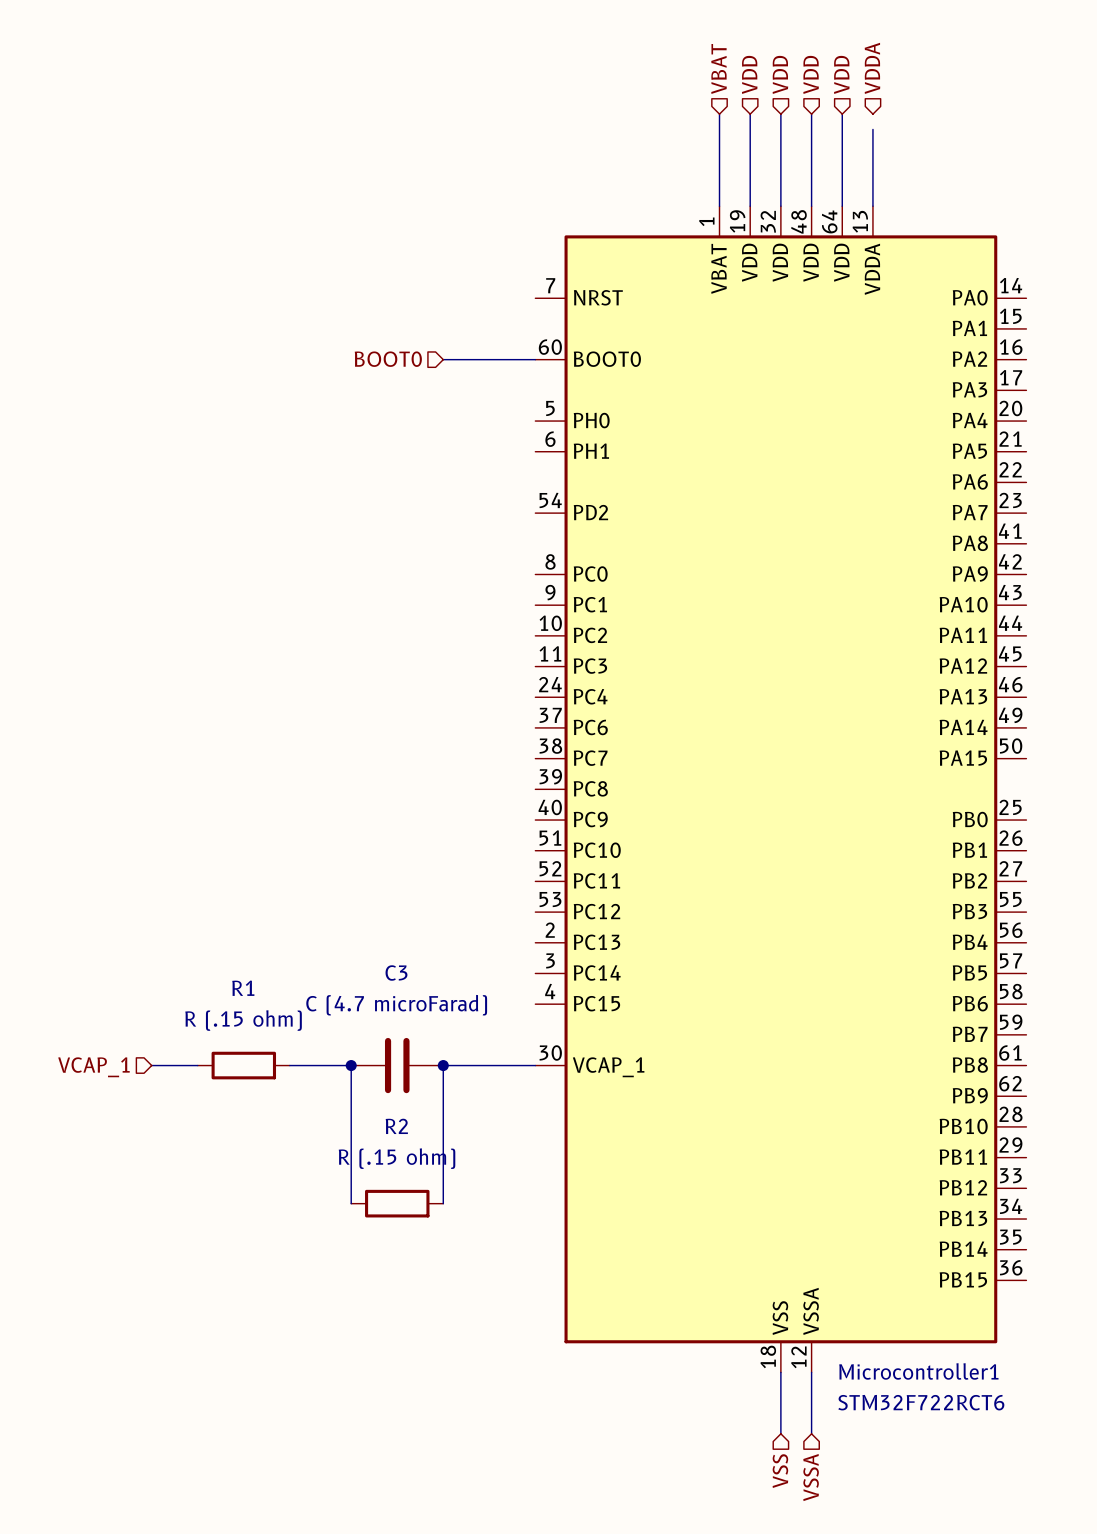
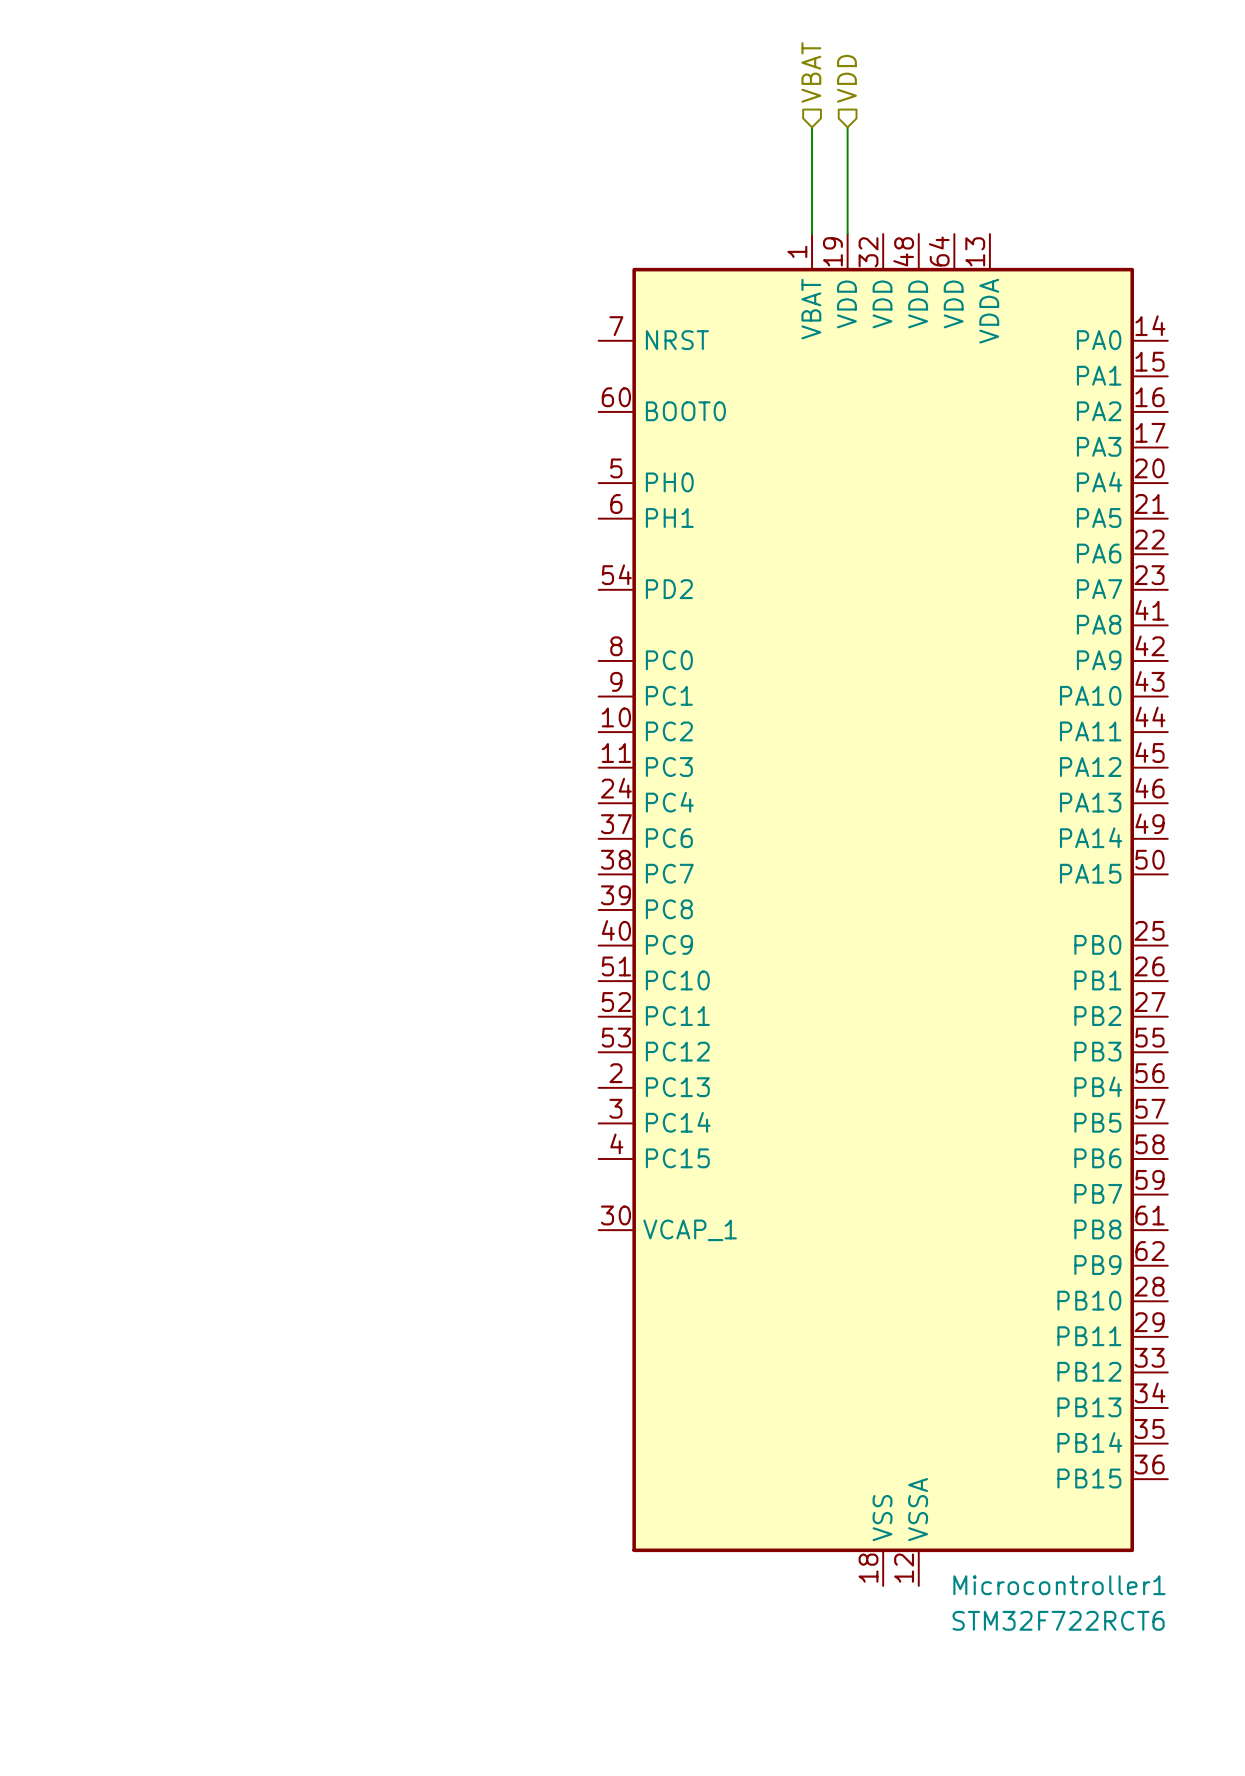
hierarchical label: VDDA (872, 68) -> none
hierarchical label: VDD (780, 74) -> none
hierarchical label: VDD (811, 74) -> none
hierarchical label: VDD (841, 74) -> none
wire: (780, 114) (780, 206) -> none
wire: (811, 114) (811, 206) -> none
wire: (842, 114) (842, 206) -> none
wire: (872, 129) (872, 206) -> none
hierarchical label: BOOT0 (388, 359) -> none
wire: (443, 359) (535, 359) -> none
wire: (151, 1065) (197, 1065) -> none
R1: R (.15 ohm) (243, 1065) -> none
wire: (289, 1065) (351, 1065) (351, 1203) -> none
junction: (351, 1065) -> none
C3: C (4.7 microFarad) (397, 1065) -> none
junction: (443, 1065) -> none
wire: (535, 1065) (443, 1065) (443, 1203) -> none
hierarchical label: VCAP_1 (93, 1067) -> none
R2: R (.15 ohm) (397, 1203) -> none
wire: (780, 1372) (780, 1433) -> none
wire: (811, 1372) (811, 1433) -> none
hierarchical label: VSS (780, 1471) -> none
hierarchical label: VSSA (811, 1477) -> none

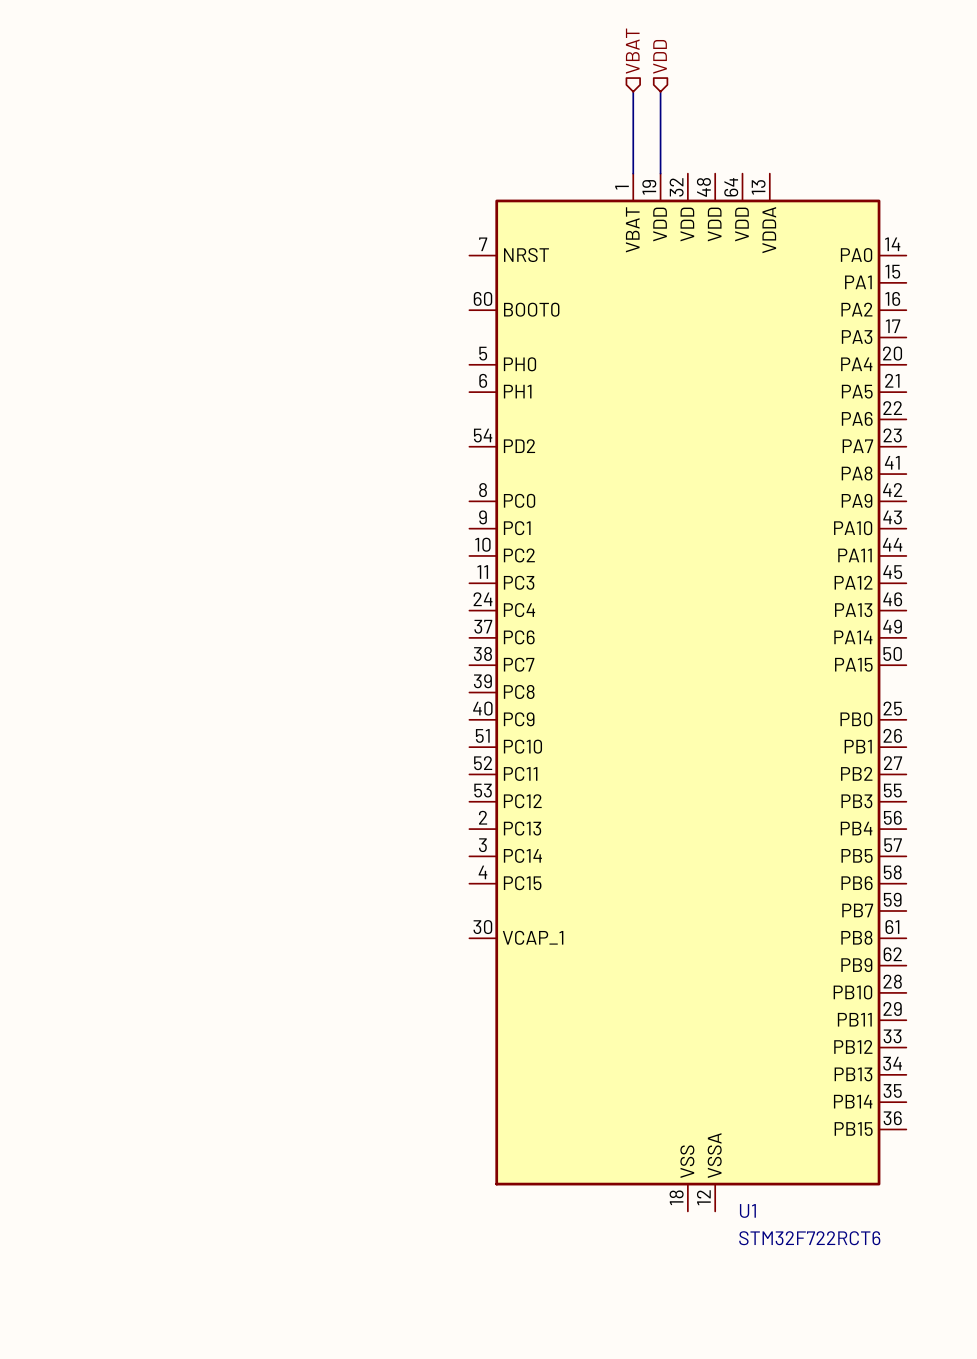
Microcontroller1 name: Microcontroller1 (1059, 1585) -> U1 (747, 1210)

